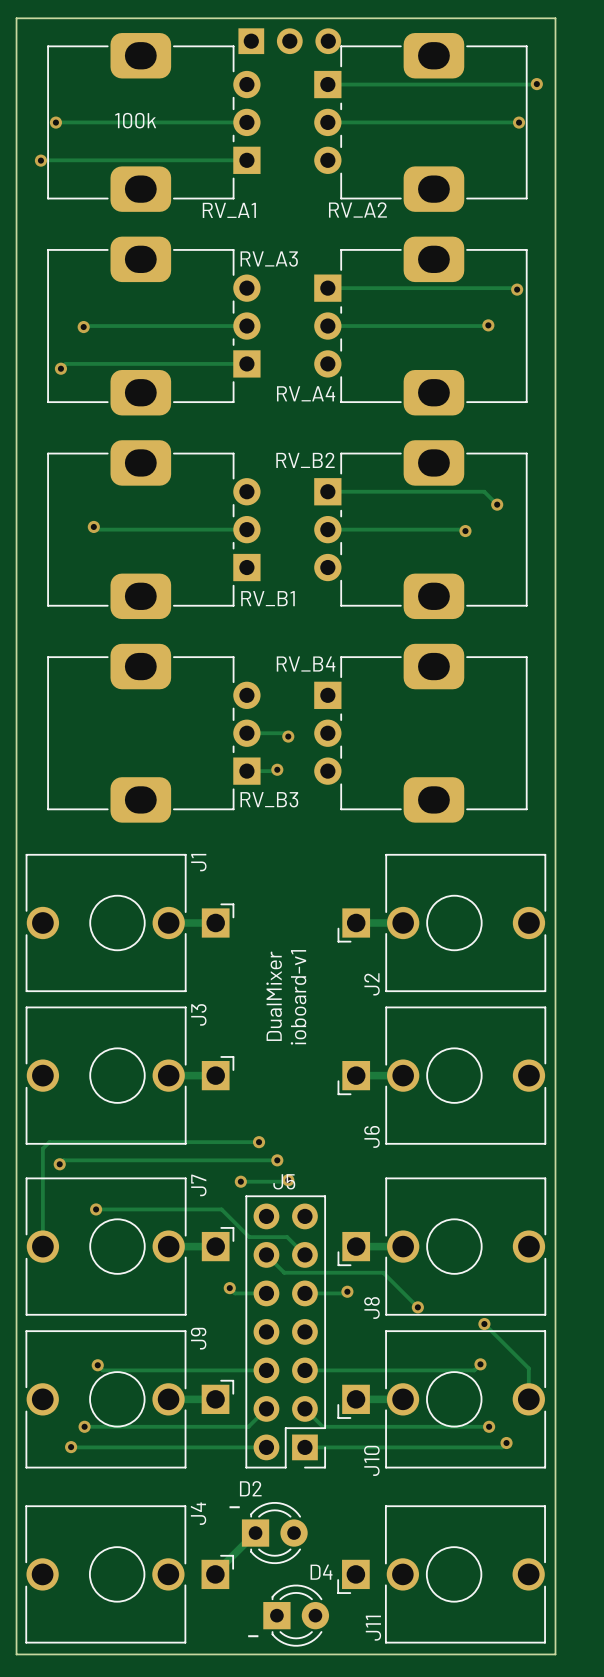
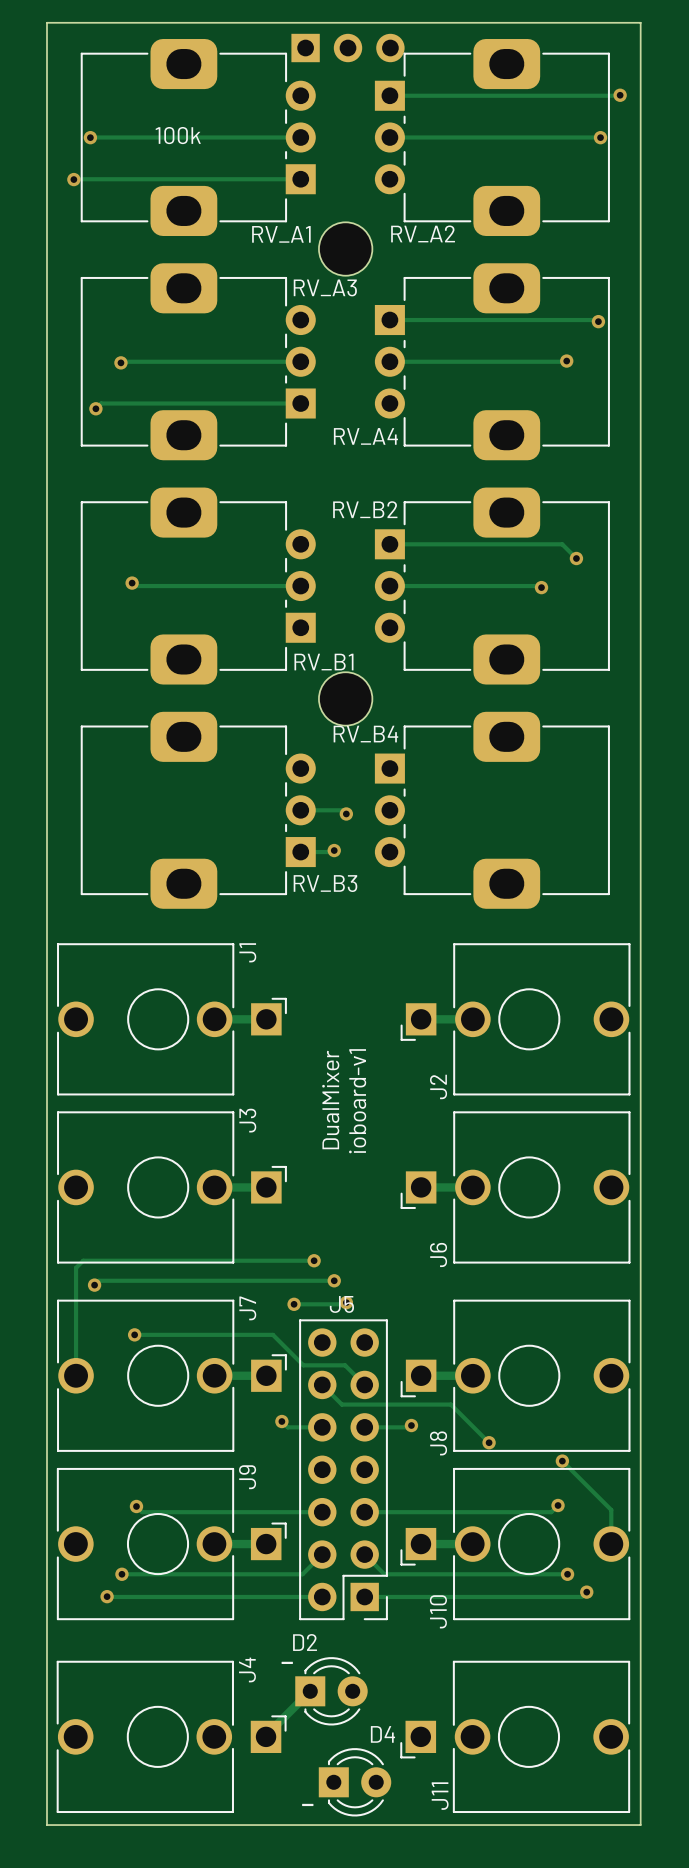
part: none -> (345, 249)
part: none -> (345, 698)

